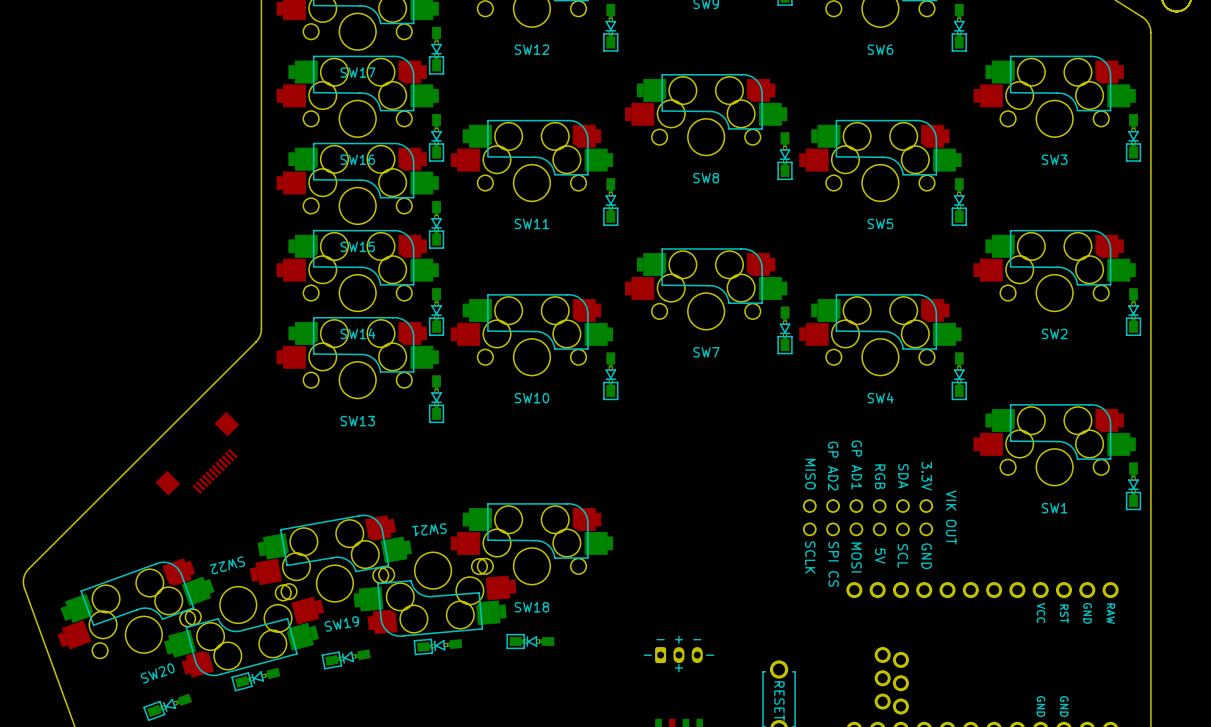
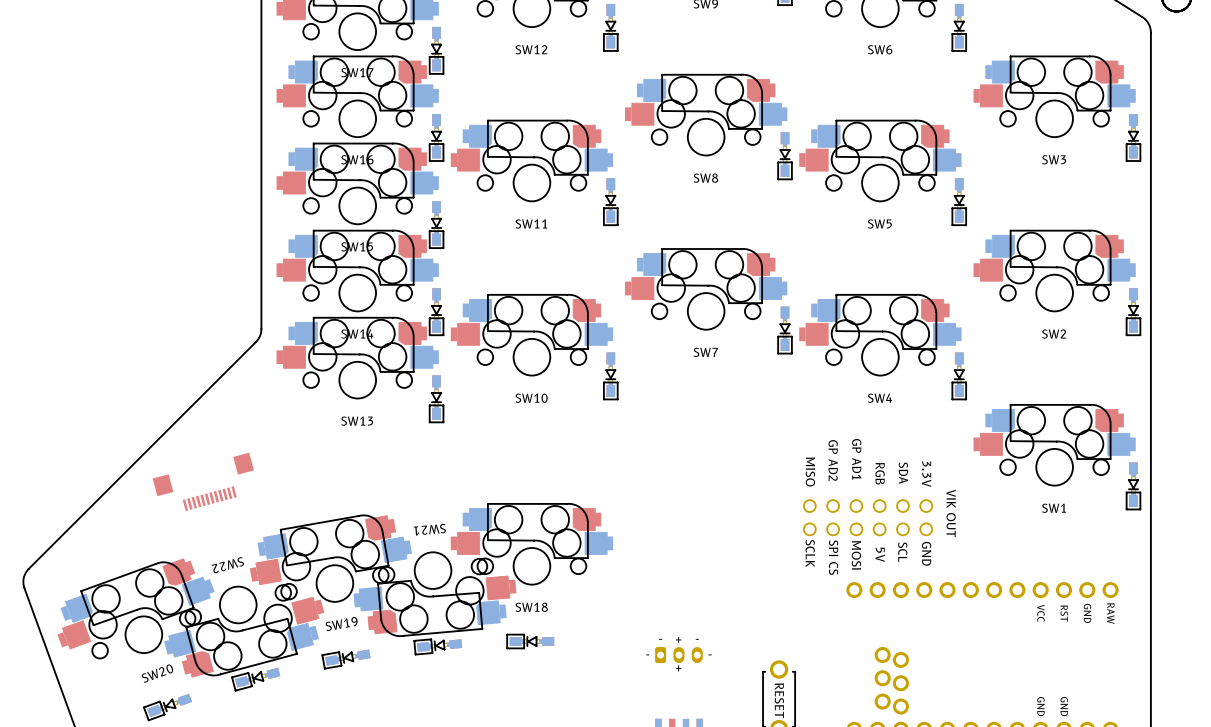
part: (197, 453) -> none
part: none -> (203, 481)

